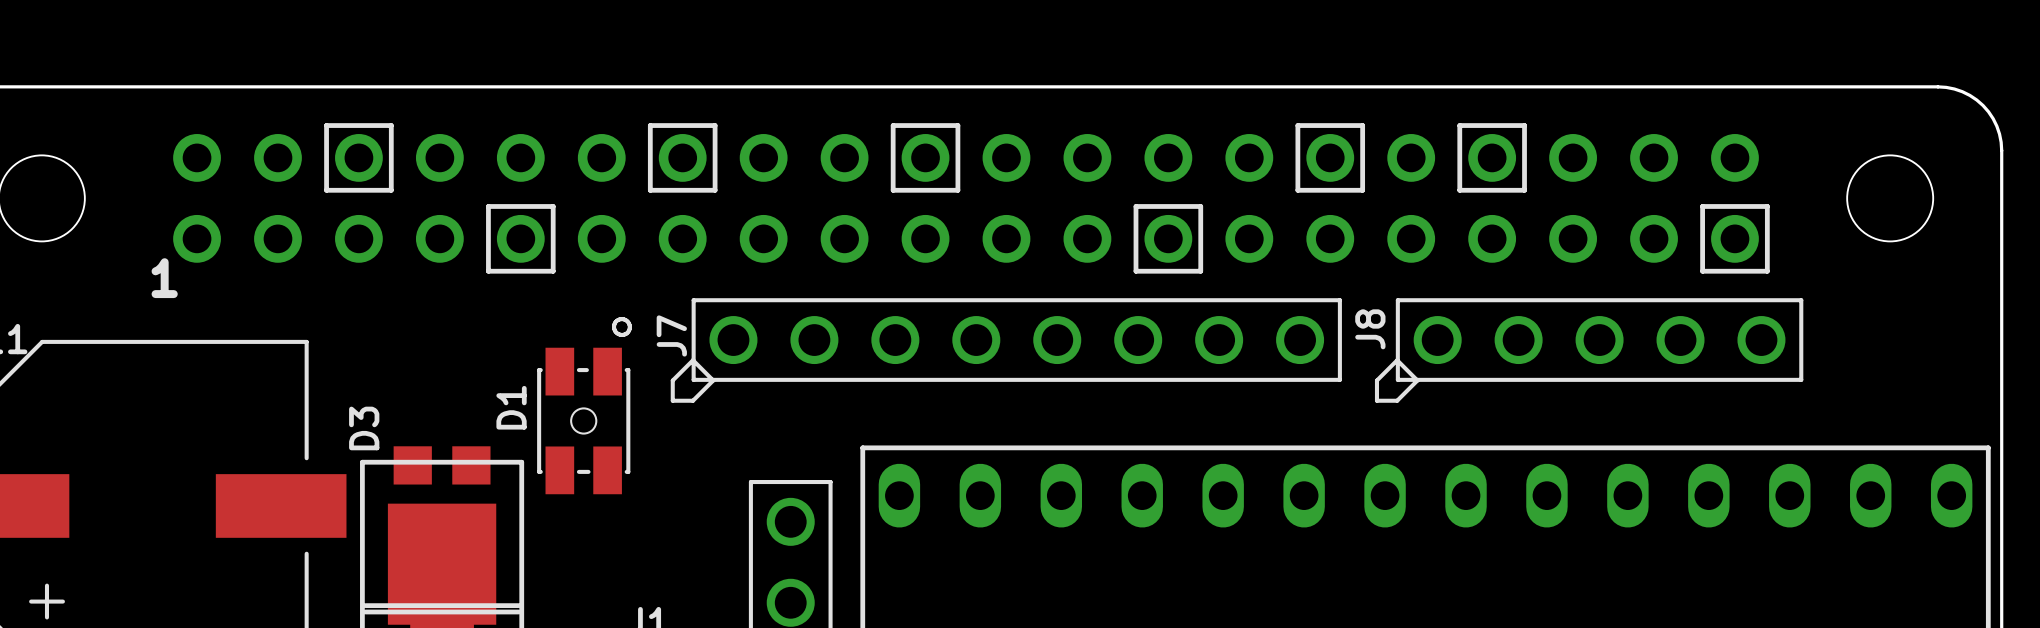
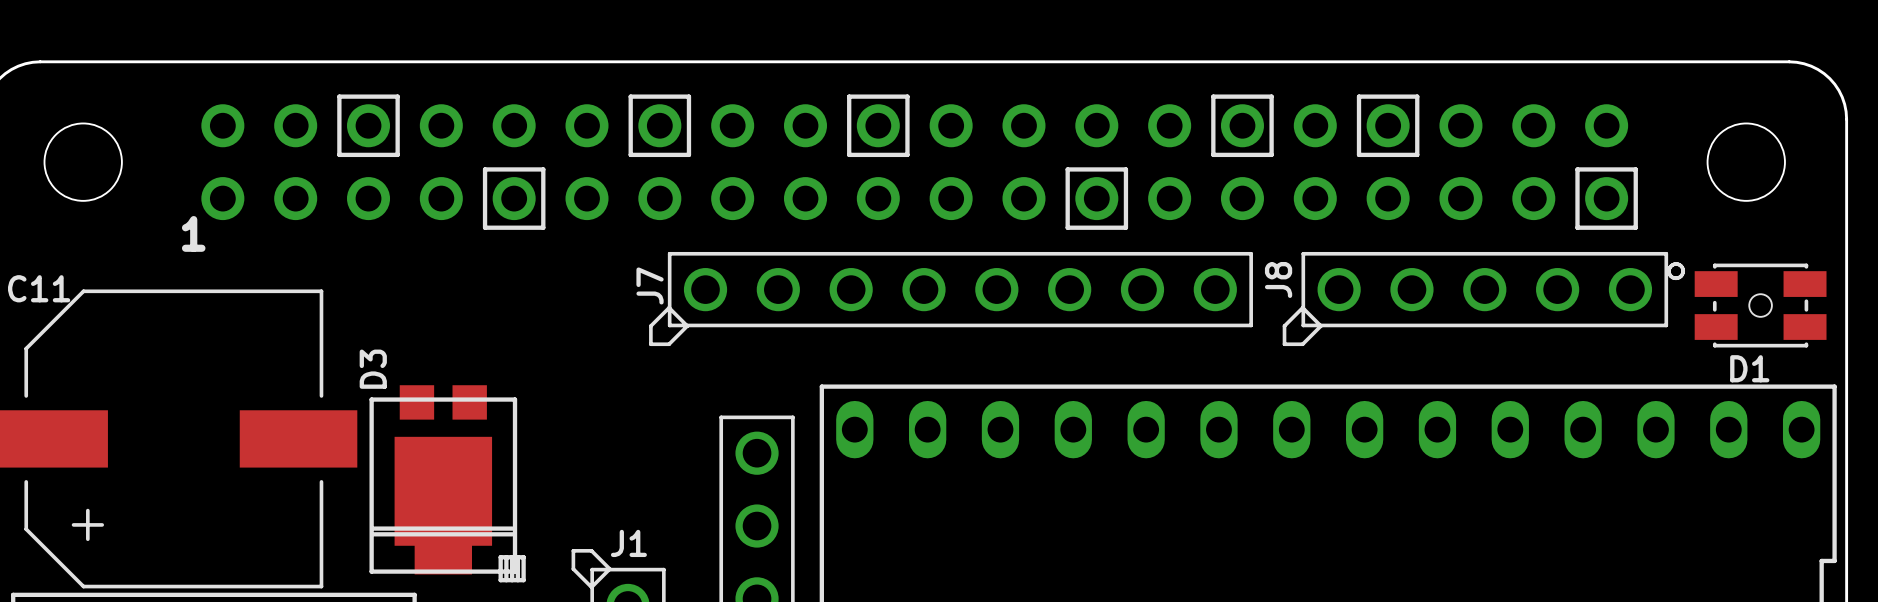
D1 rotation: 0° (584, 405) -> 90° counterclockwise (1746, 304)
D1 position: (584, 405) -> (1746, 304)

